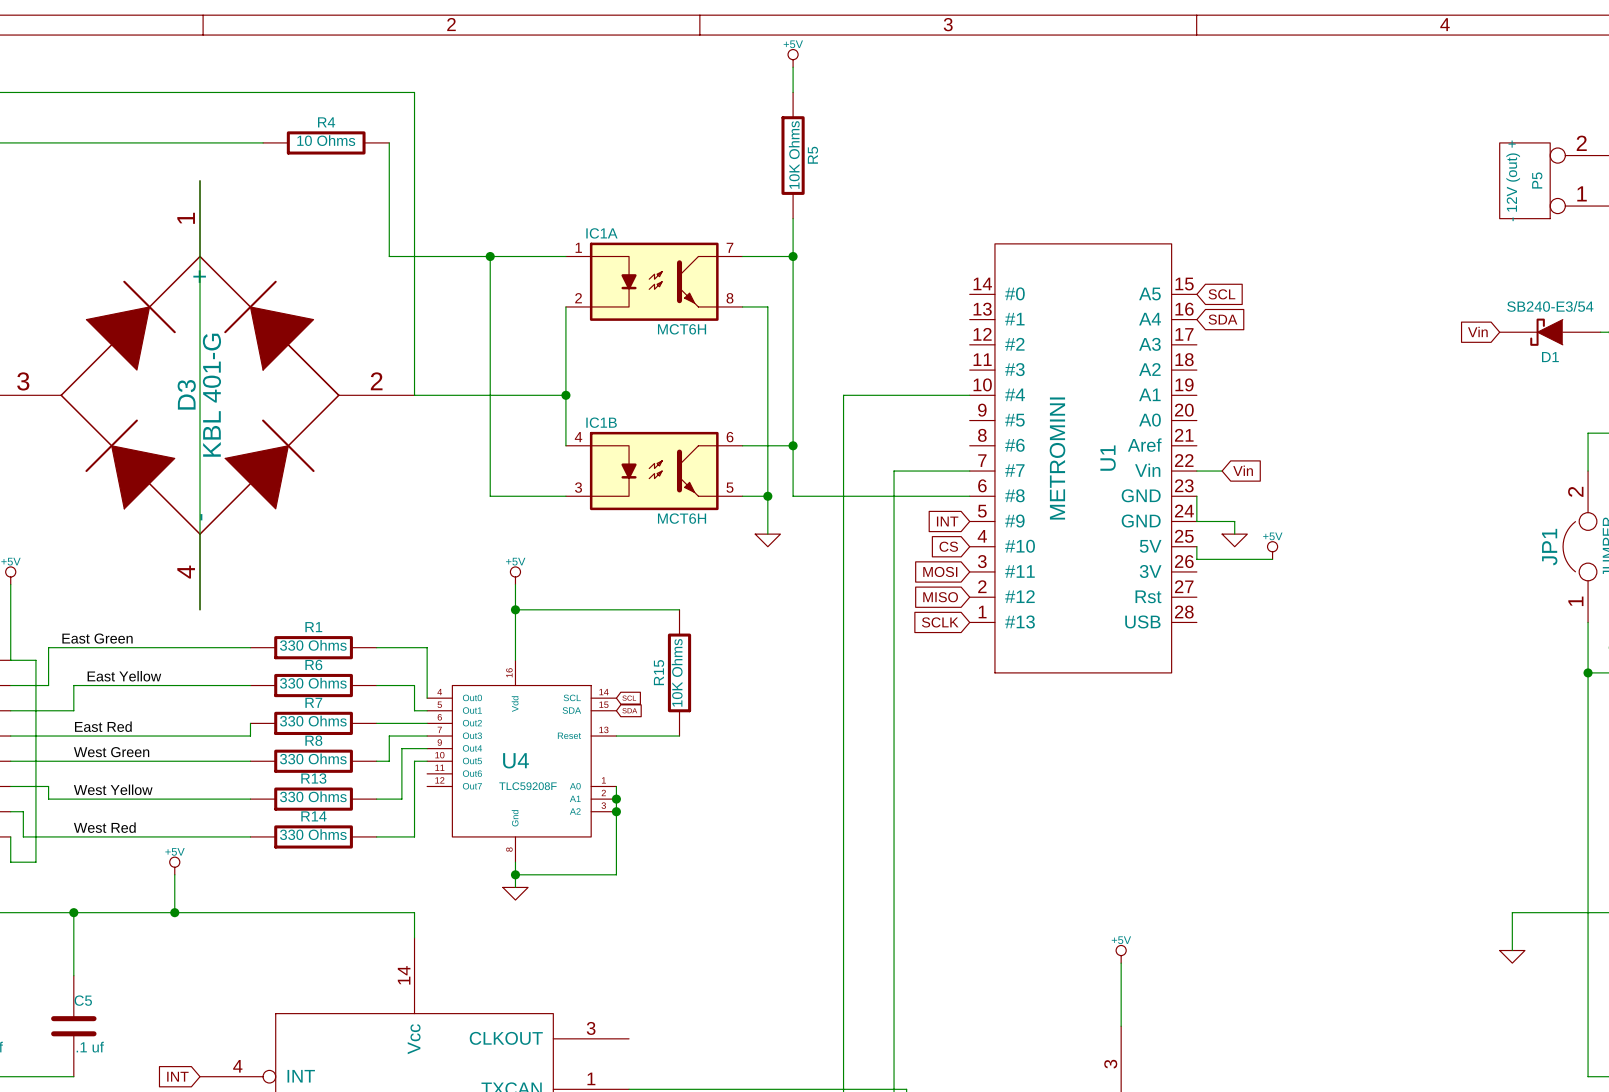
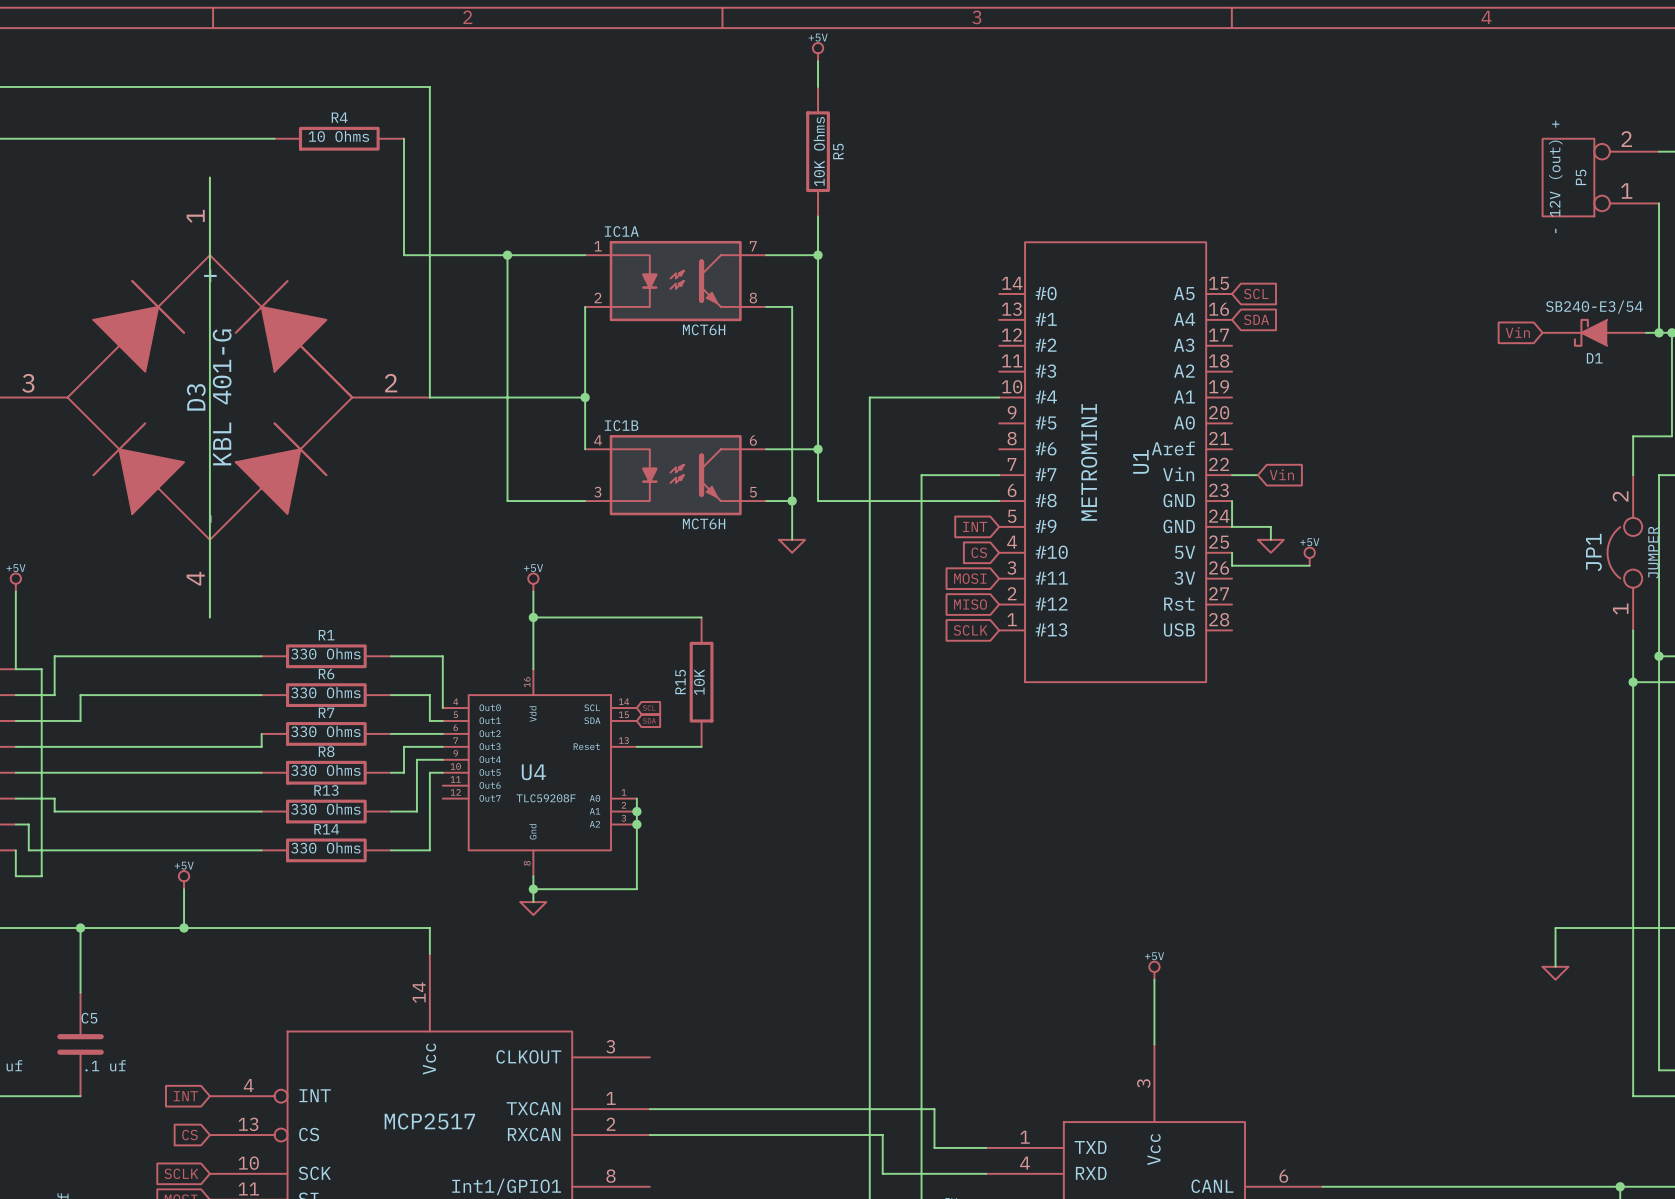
label: East Green (97, 638) -> none
R15 value: 10K Ohms (677, 672) -> 10K (699, 682)
label: East Yellow (124, 676) -> none
label: East Red (103, 726) -> none
label: West Green (111, 752) -> none
label: West Yellow (113, 789) -> none
label: West Red (104, 827) -> none

